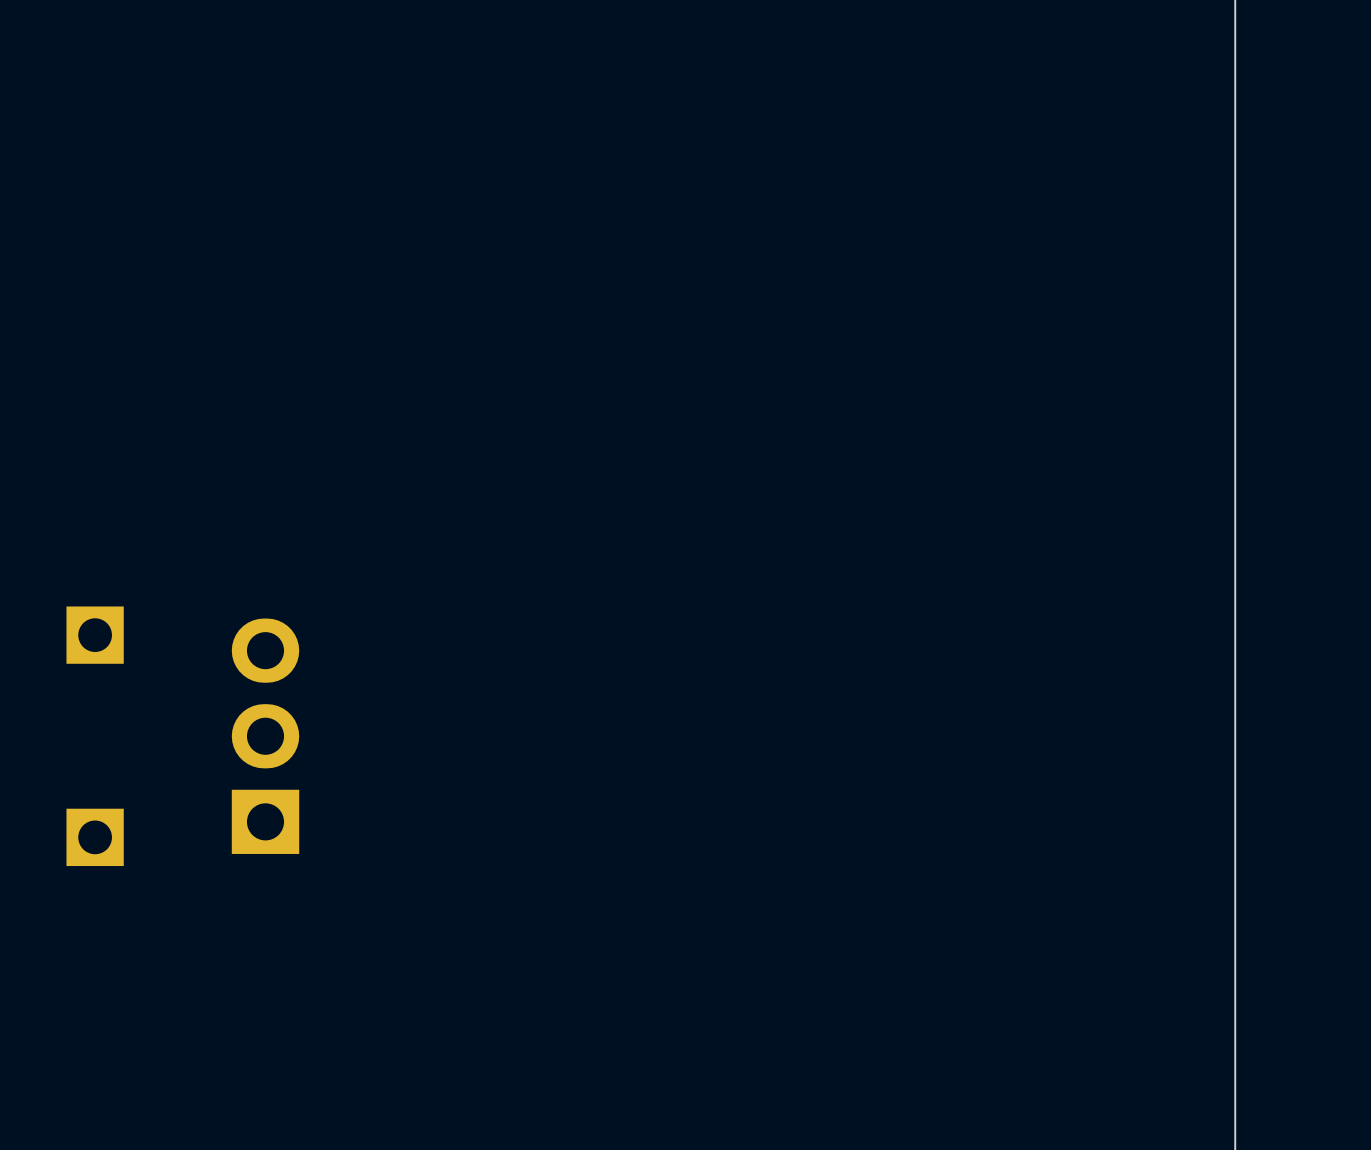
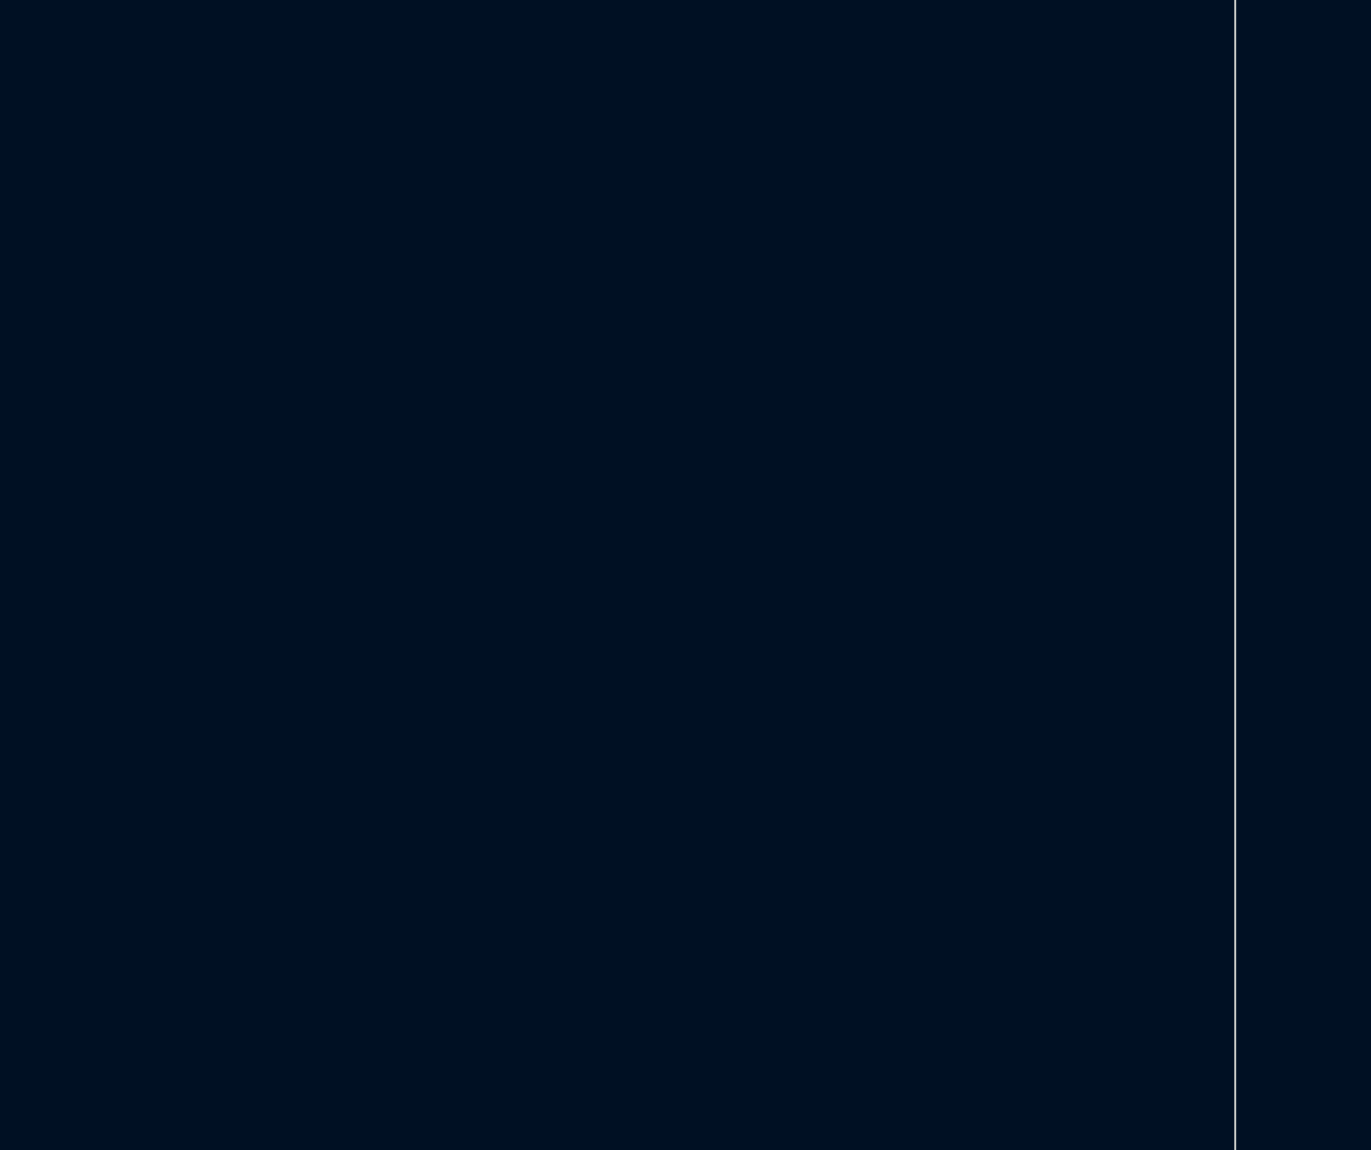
part: (95, 635) -> none
part: (265, 736) -> none
part: (95, 837) -> none

